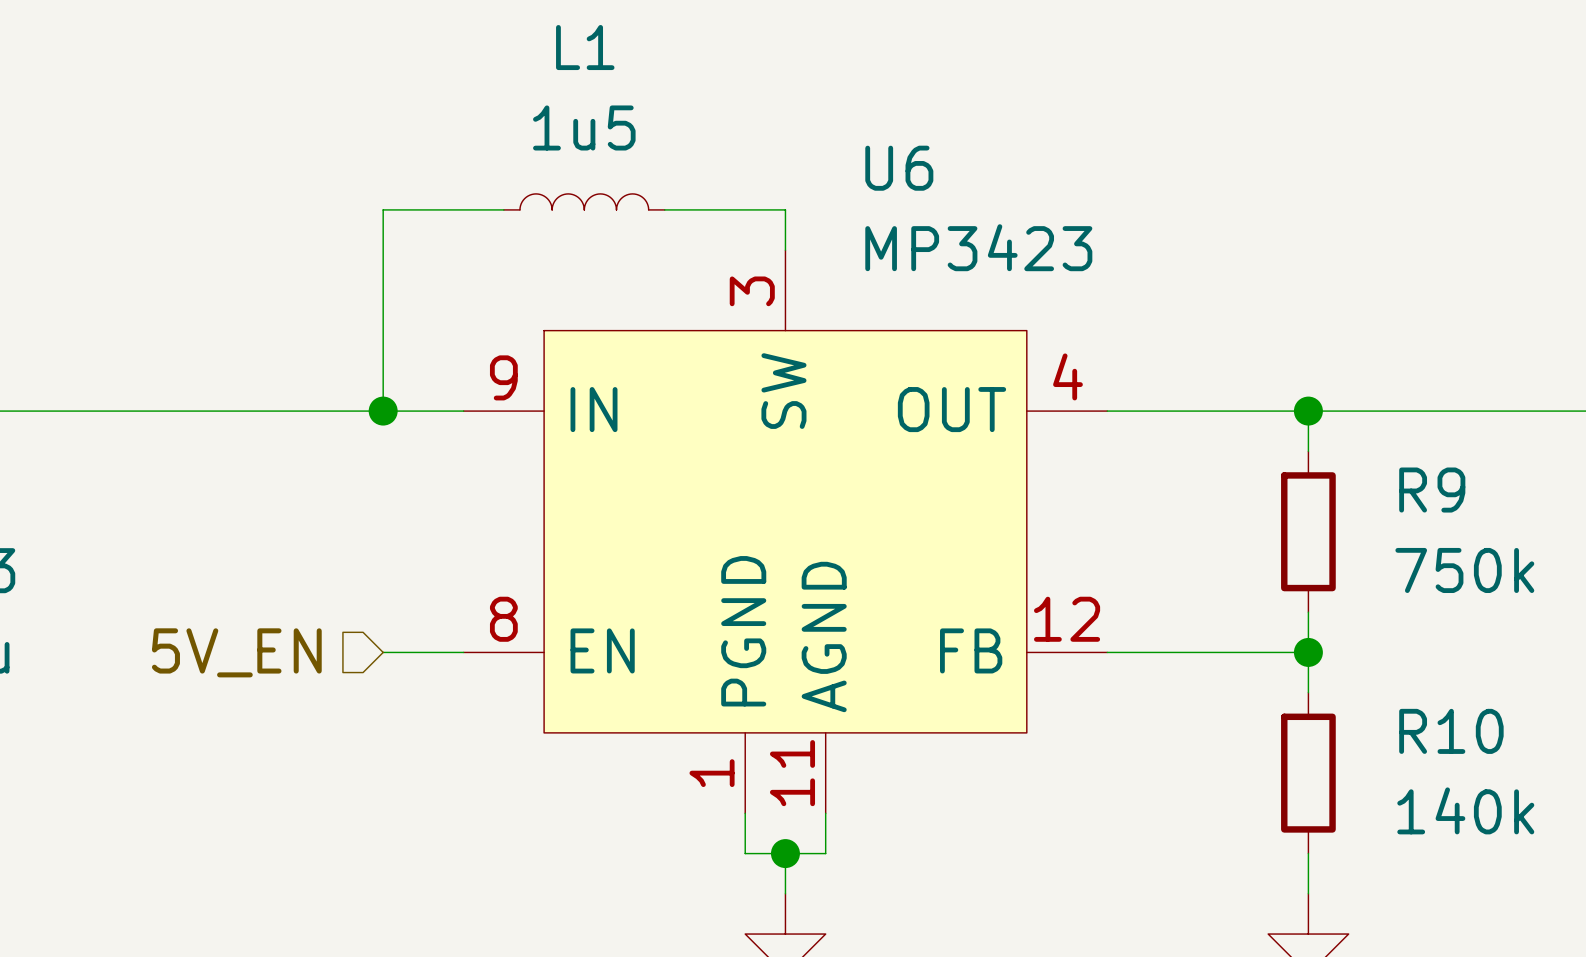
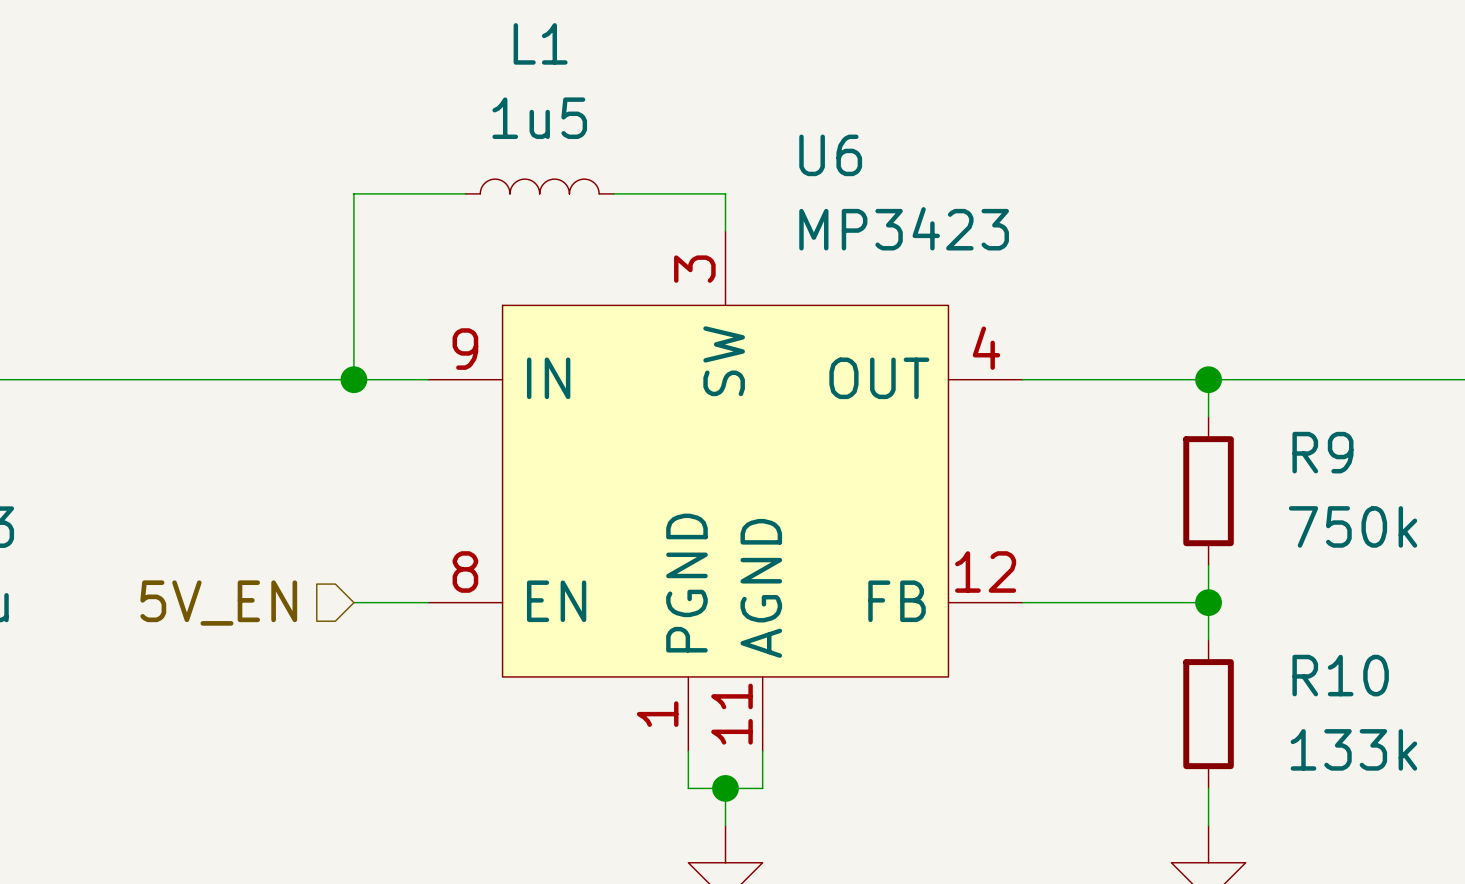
R10 value: 140k (1465, 810) -> 133k (1353, 749)

